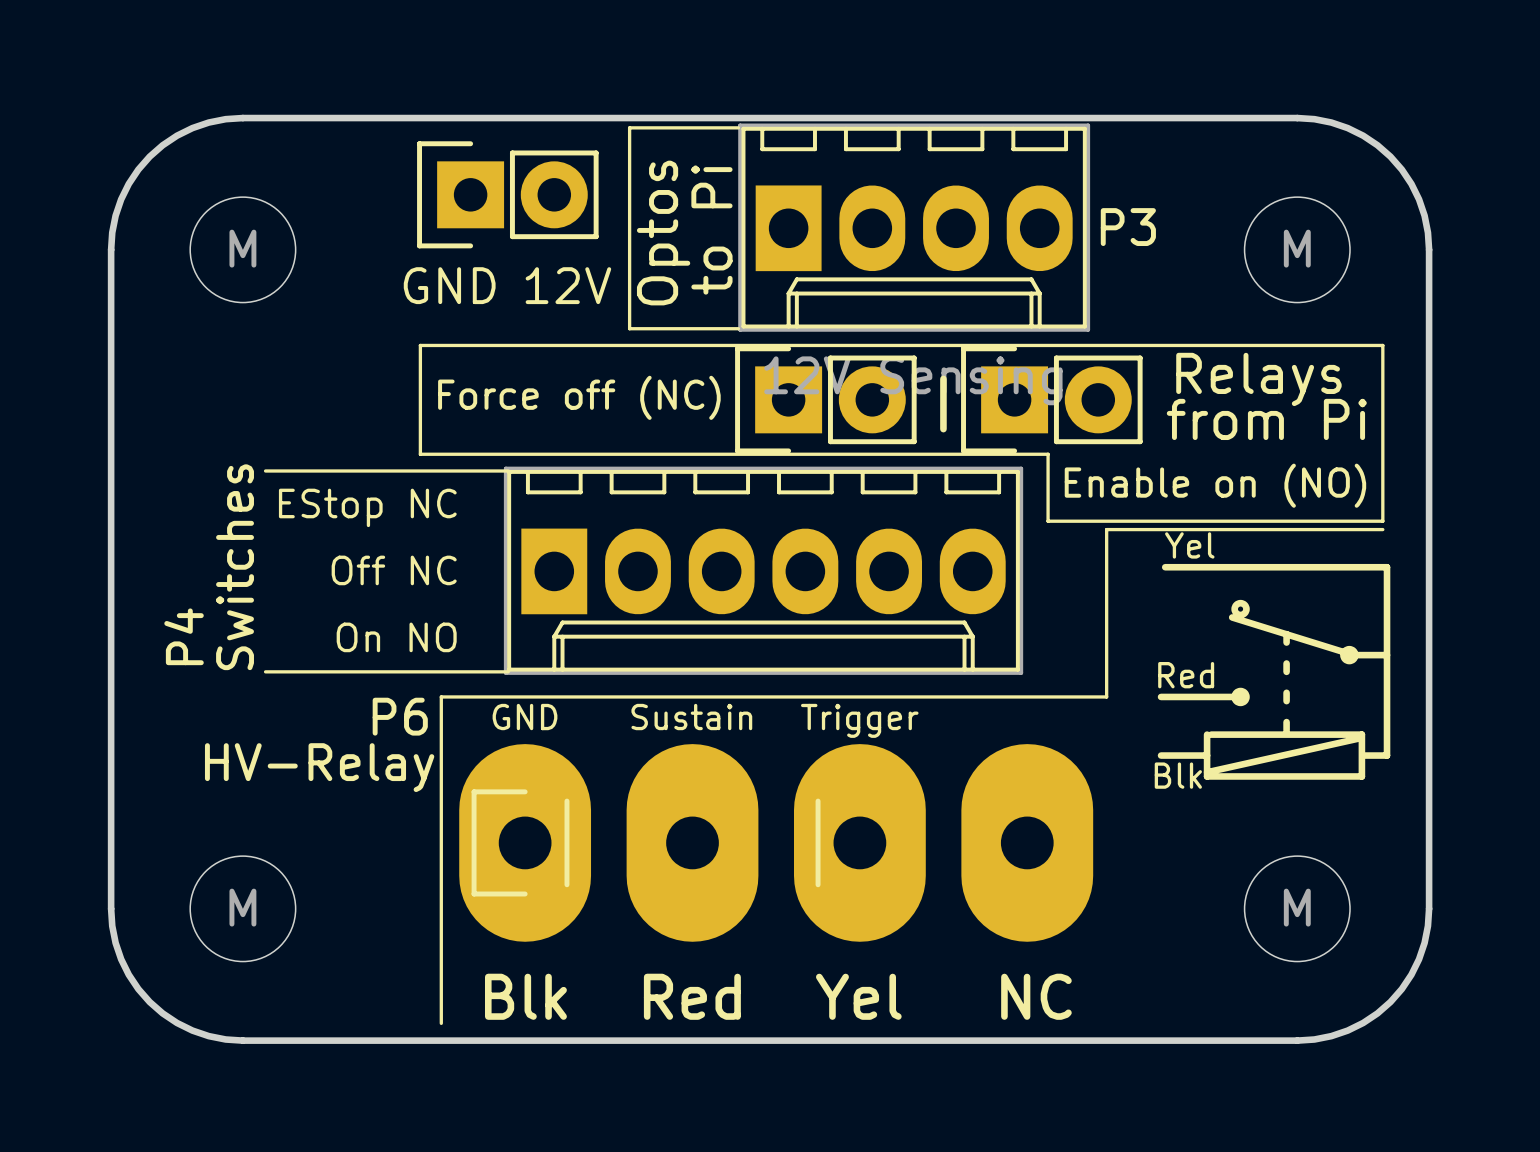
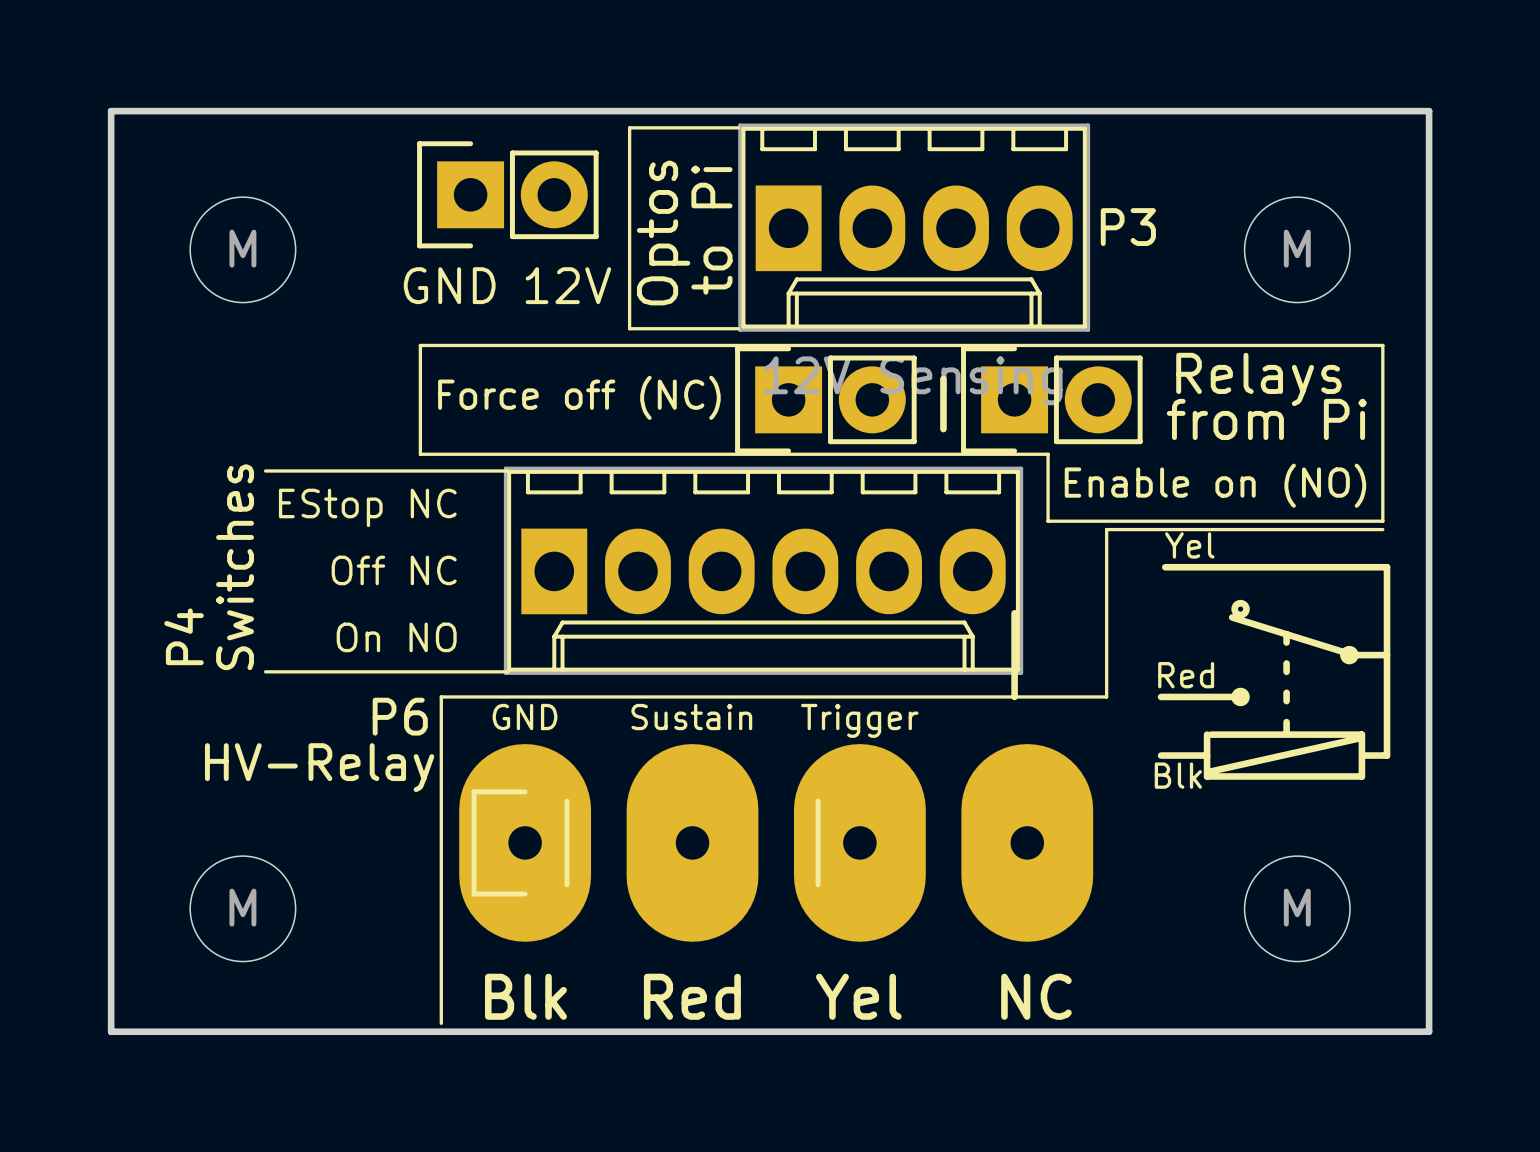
board edge: (111, 249) (115, 215) (121, 199) (128, 183) (149, 156) (162, 145) (192, 128) (208, 122) (242, 118) (1314, 119) (1347, 128) (1377, 145) (1390, 156) (1411, 183) (1419, 199) (1424, 215) (1429, 249) -> (111, 249) (111, 111) (1429, 111) (1429, 249)
line: none -> (1014, 613) (1014, 696)
P6 footprint: [459, 744, 1094, 942] -> [459, 744, 1094, 942]
board edge: (111, 908) (115, 942) (121, 959) (128, 974) (149, 1002) (162, 1013) (192, 1030) (208, 1036) (242, 1040) (1314, 1039) (1347, 1030) (1377, 1013) (1390, 1002) (1411, 974) (1419, 959) (1424, 942) (1429, 908) -> (111, 908) (111, 1031) (1429, 1031) (1429, 908)

